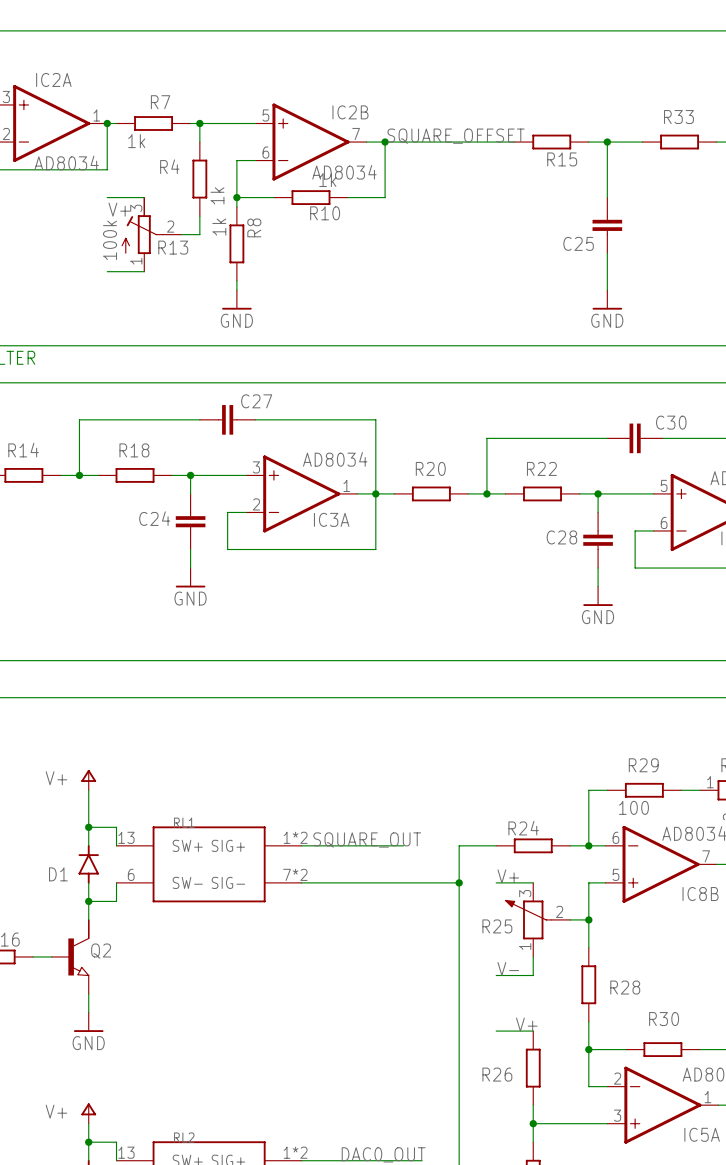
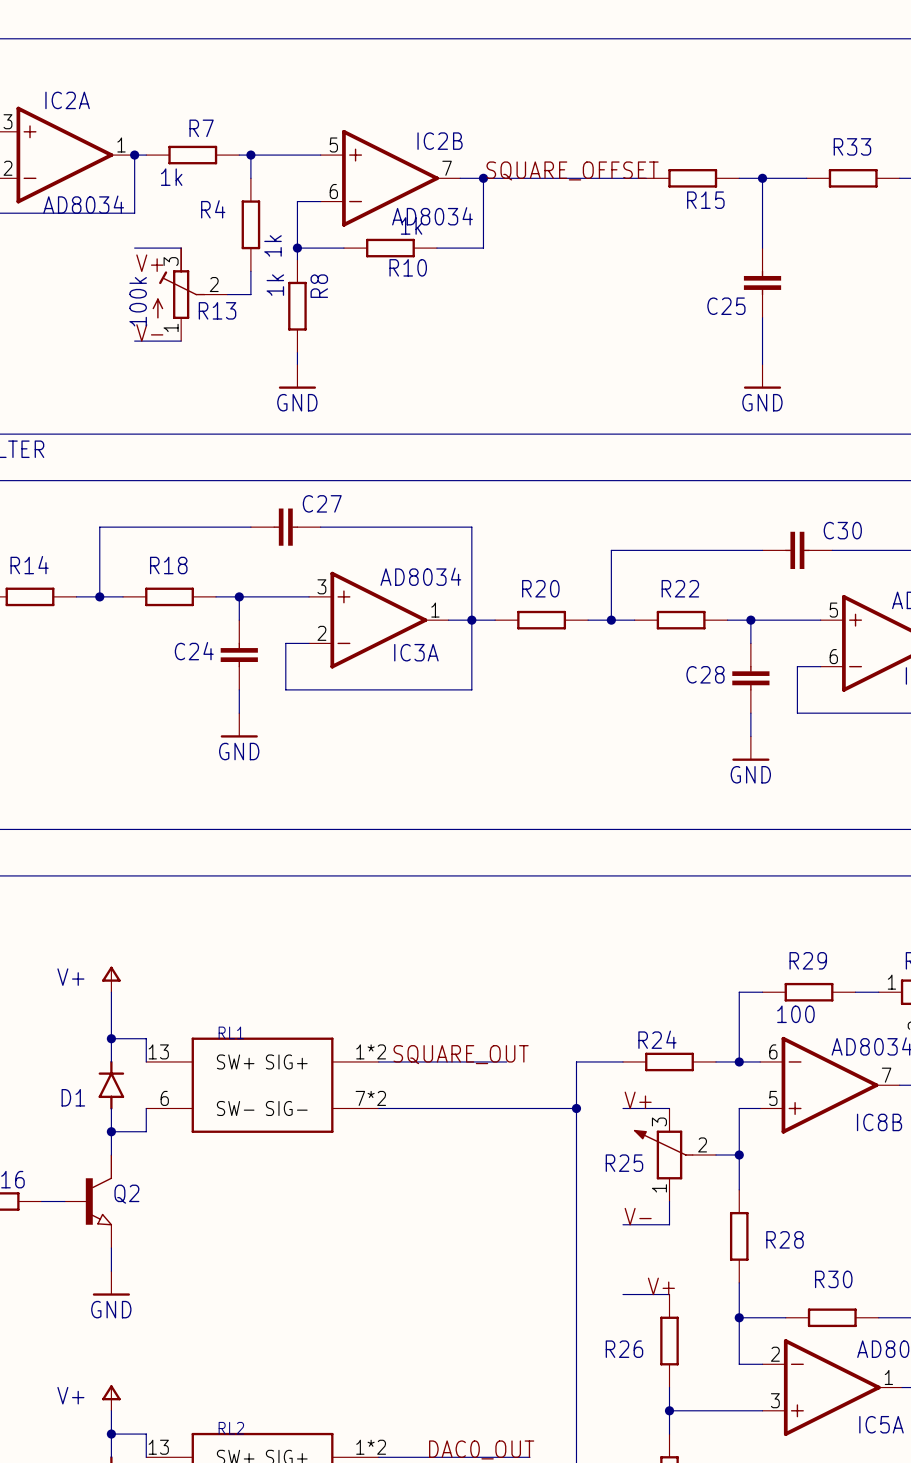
label: none -> V- (149, 332)

